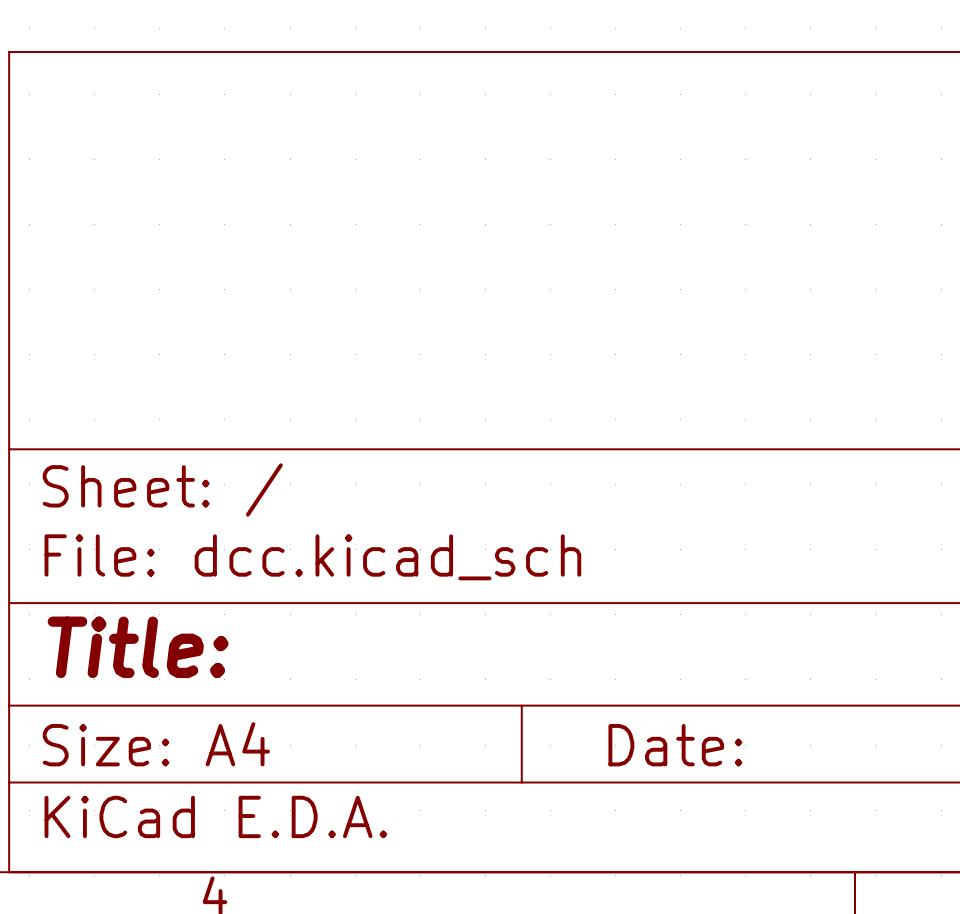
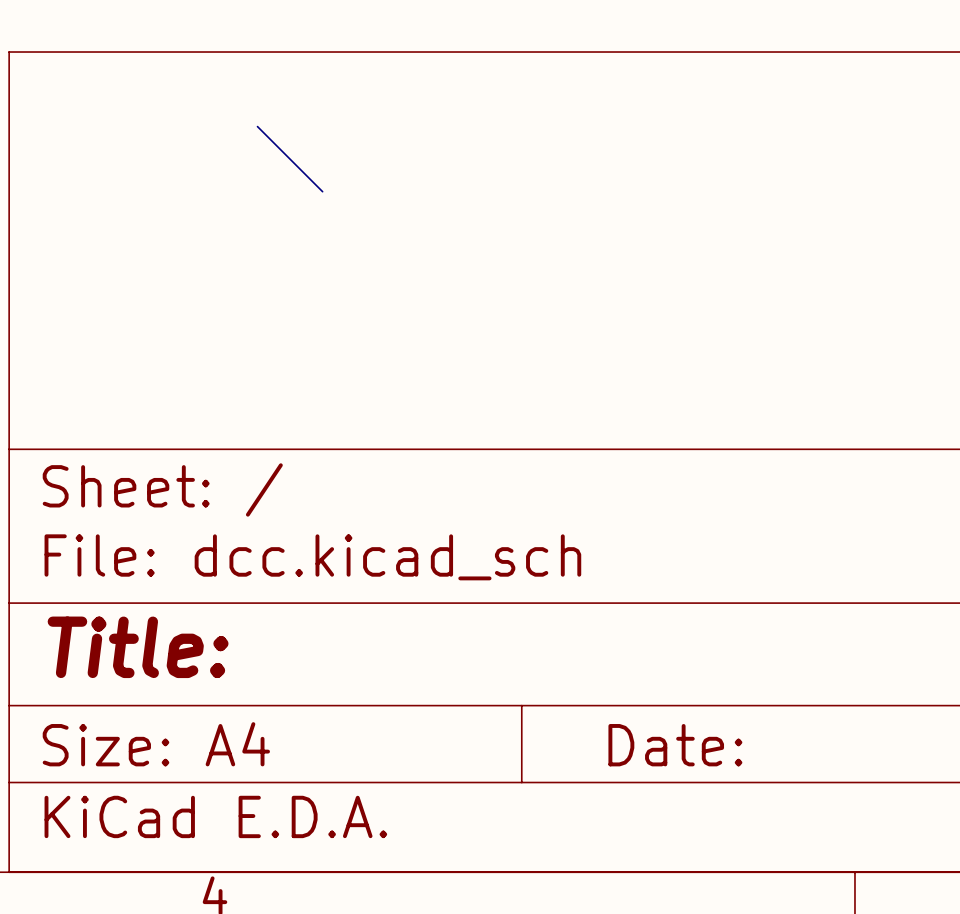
wire: none -> (257, 126) (322, 191)

